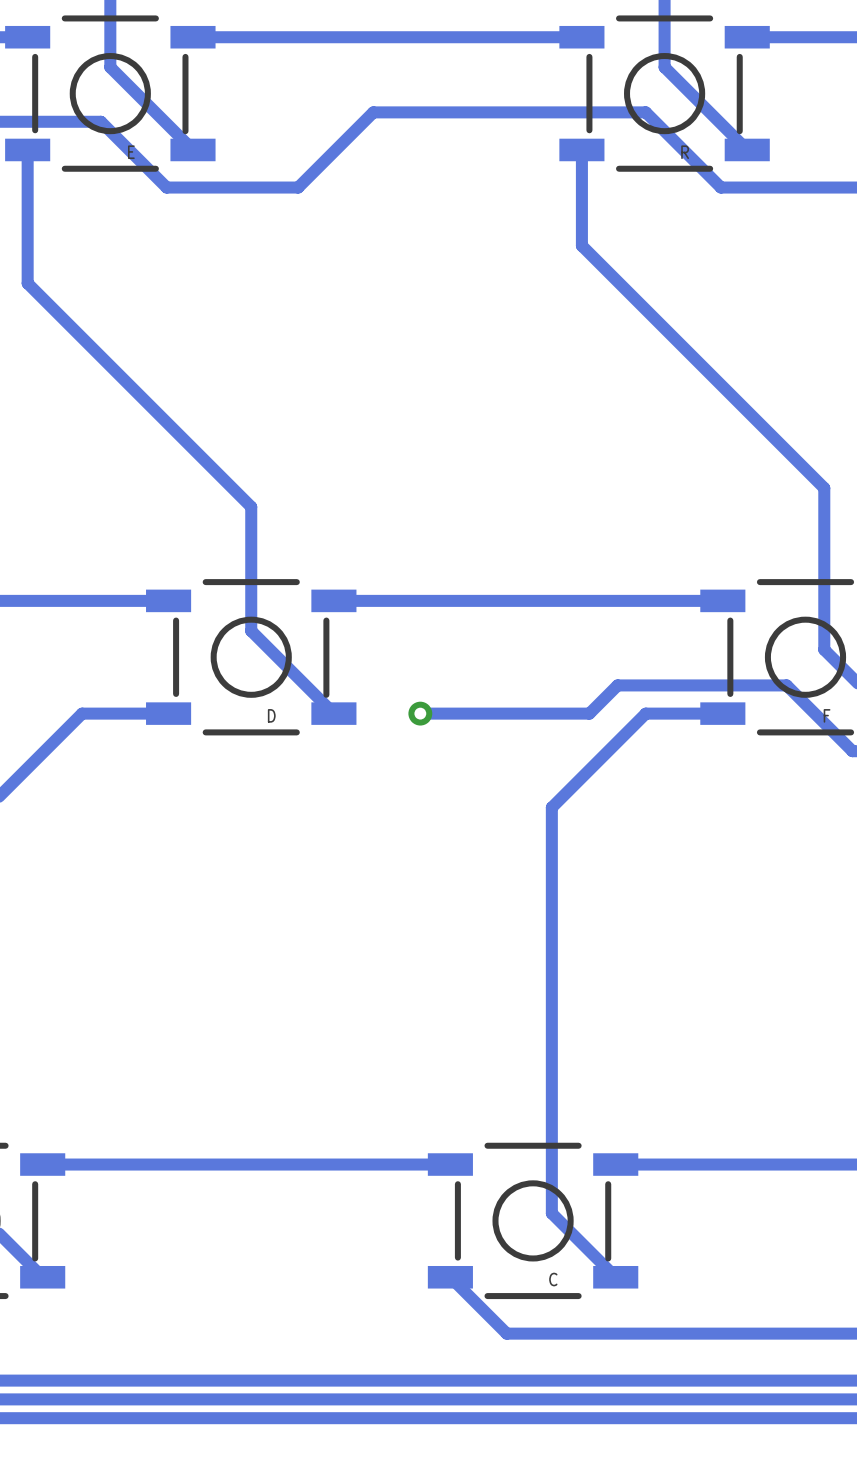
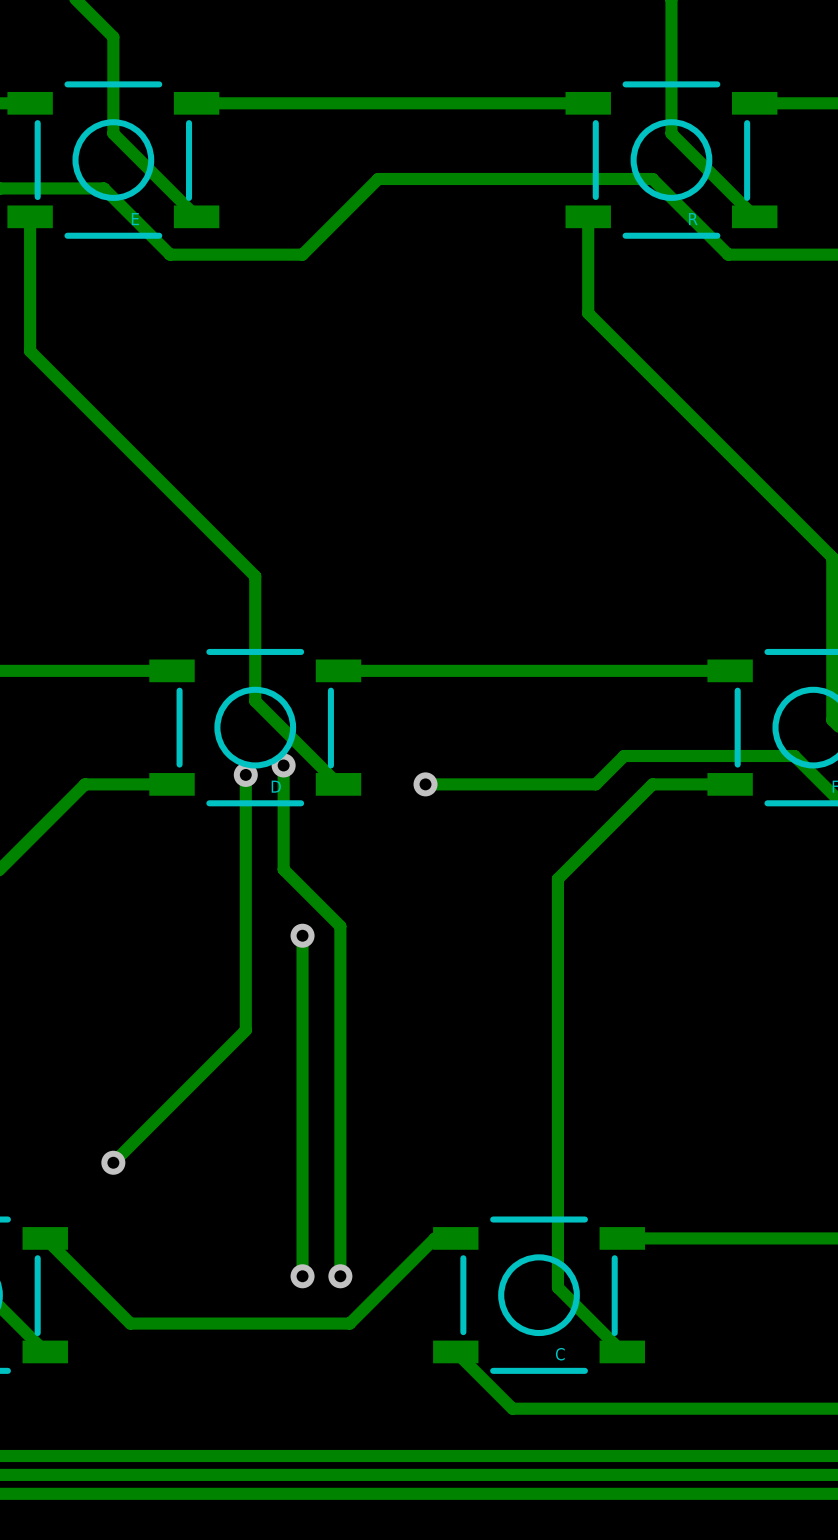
track: none -> (283, 765) (283, 869) (340, 926) (340, 1276)
via: none -> (283, 765)
track: none -> (245, 774) (245, 1030) (113, 1162)
via: none -> (245, 774)
track: none -> (302, 935) (302, 1276)
via: none -> (302, 935)
via: none -> (113, 1162)
track: (429, 1164) (42, 1164) -> (434, 1238) (349, 1323) (130, 1323) (45, 1238)
via: none -> (302, 1276)
via: none -> (340, 1276)

